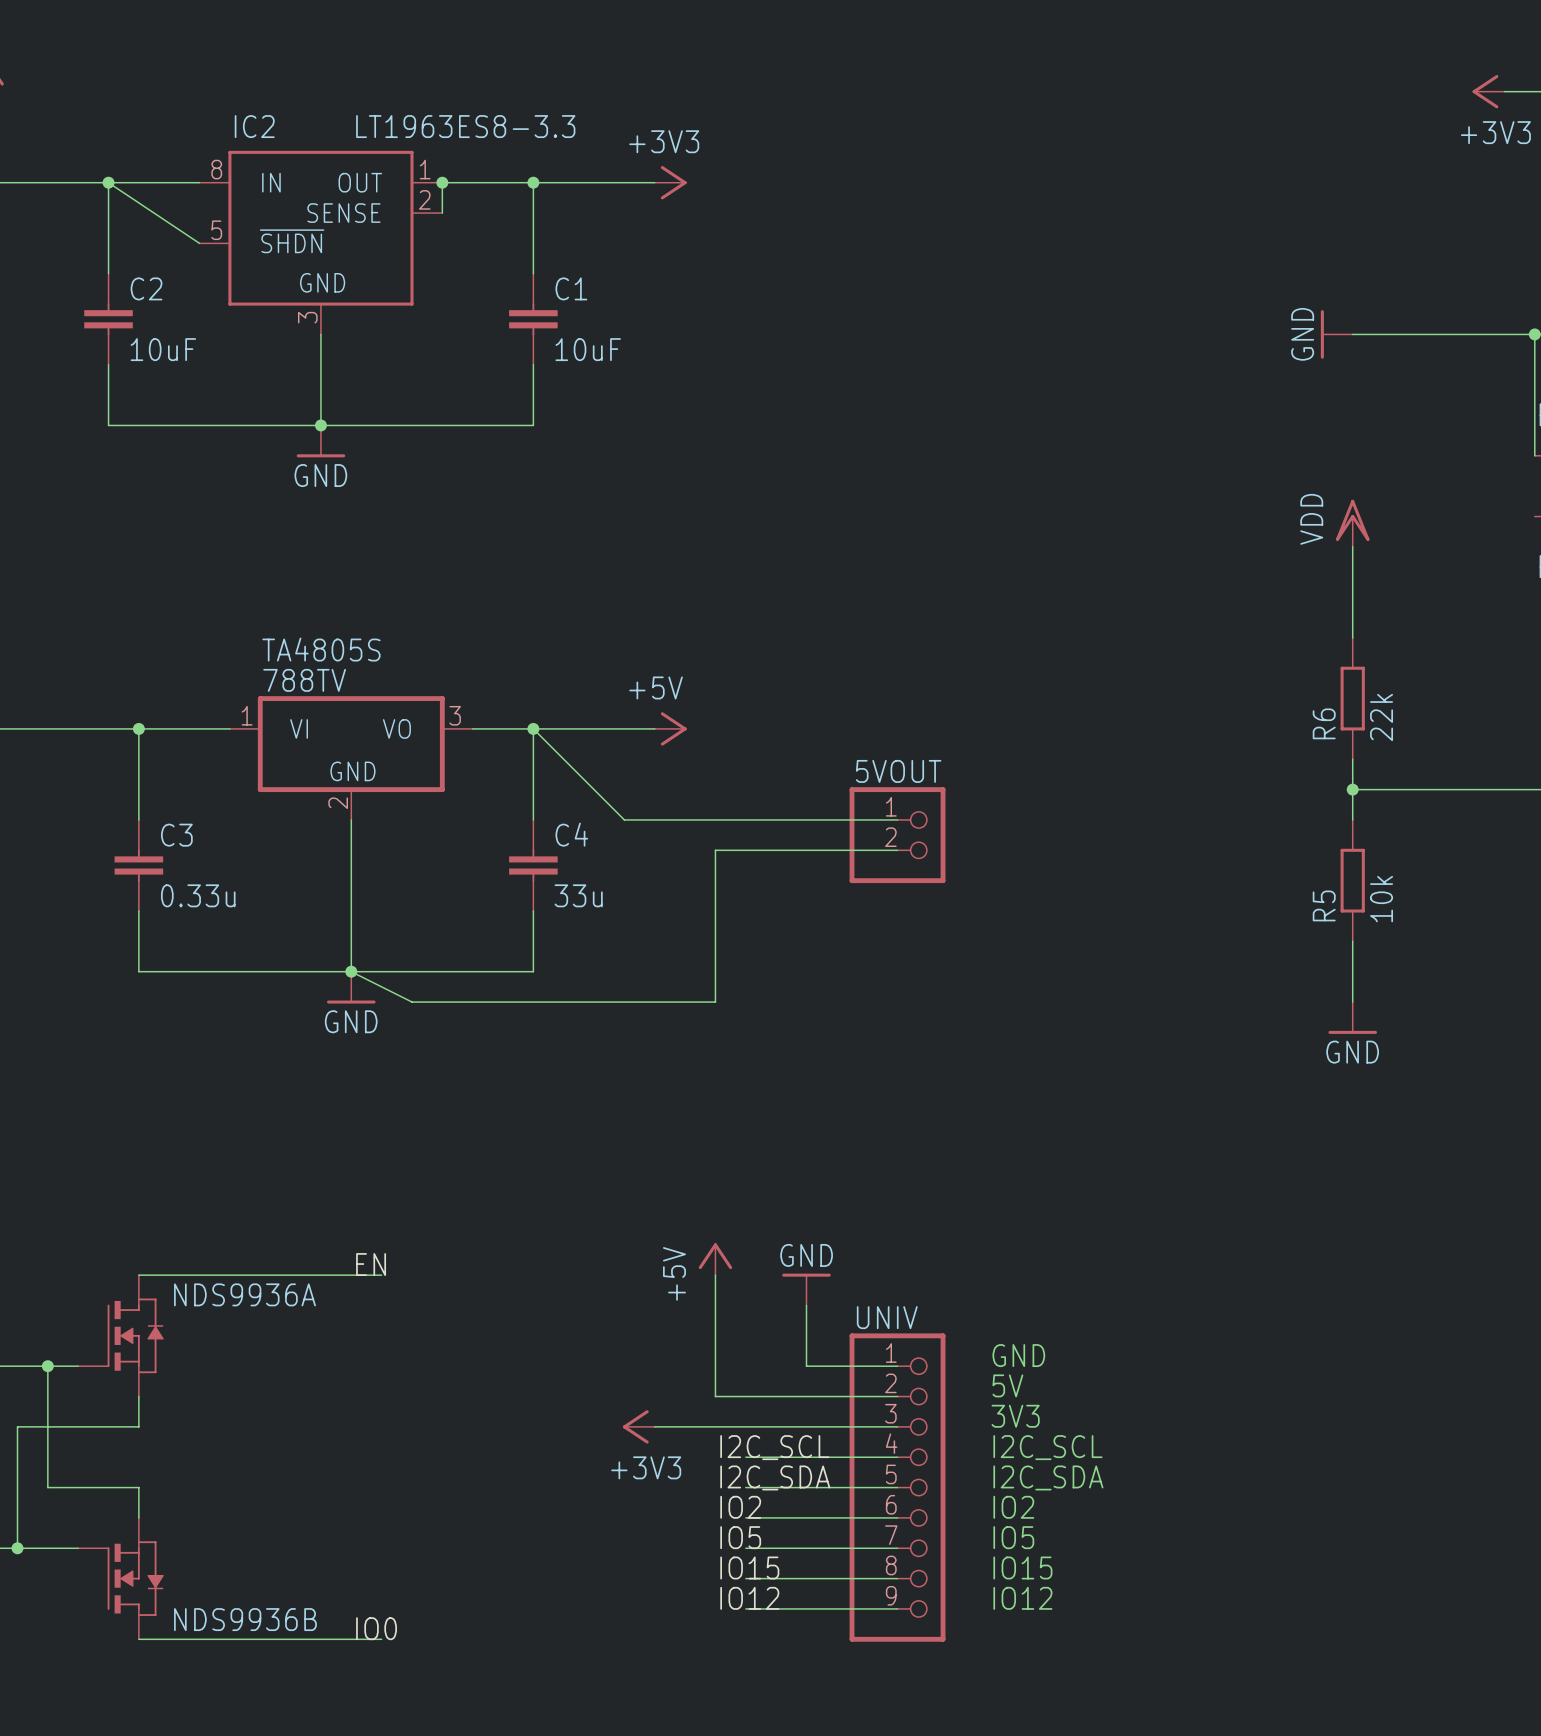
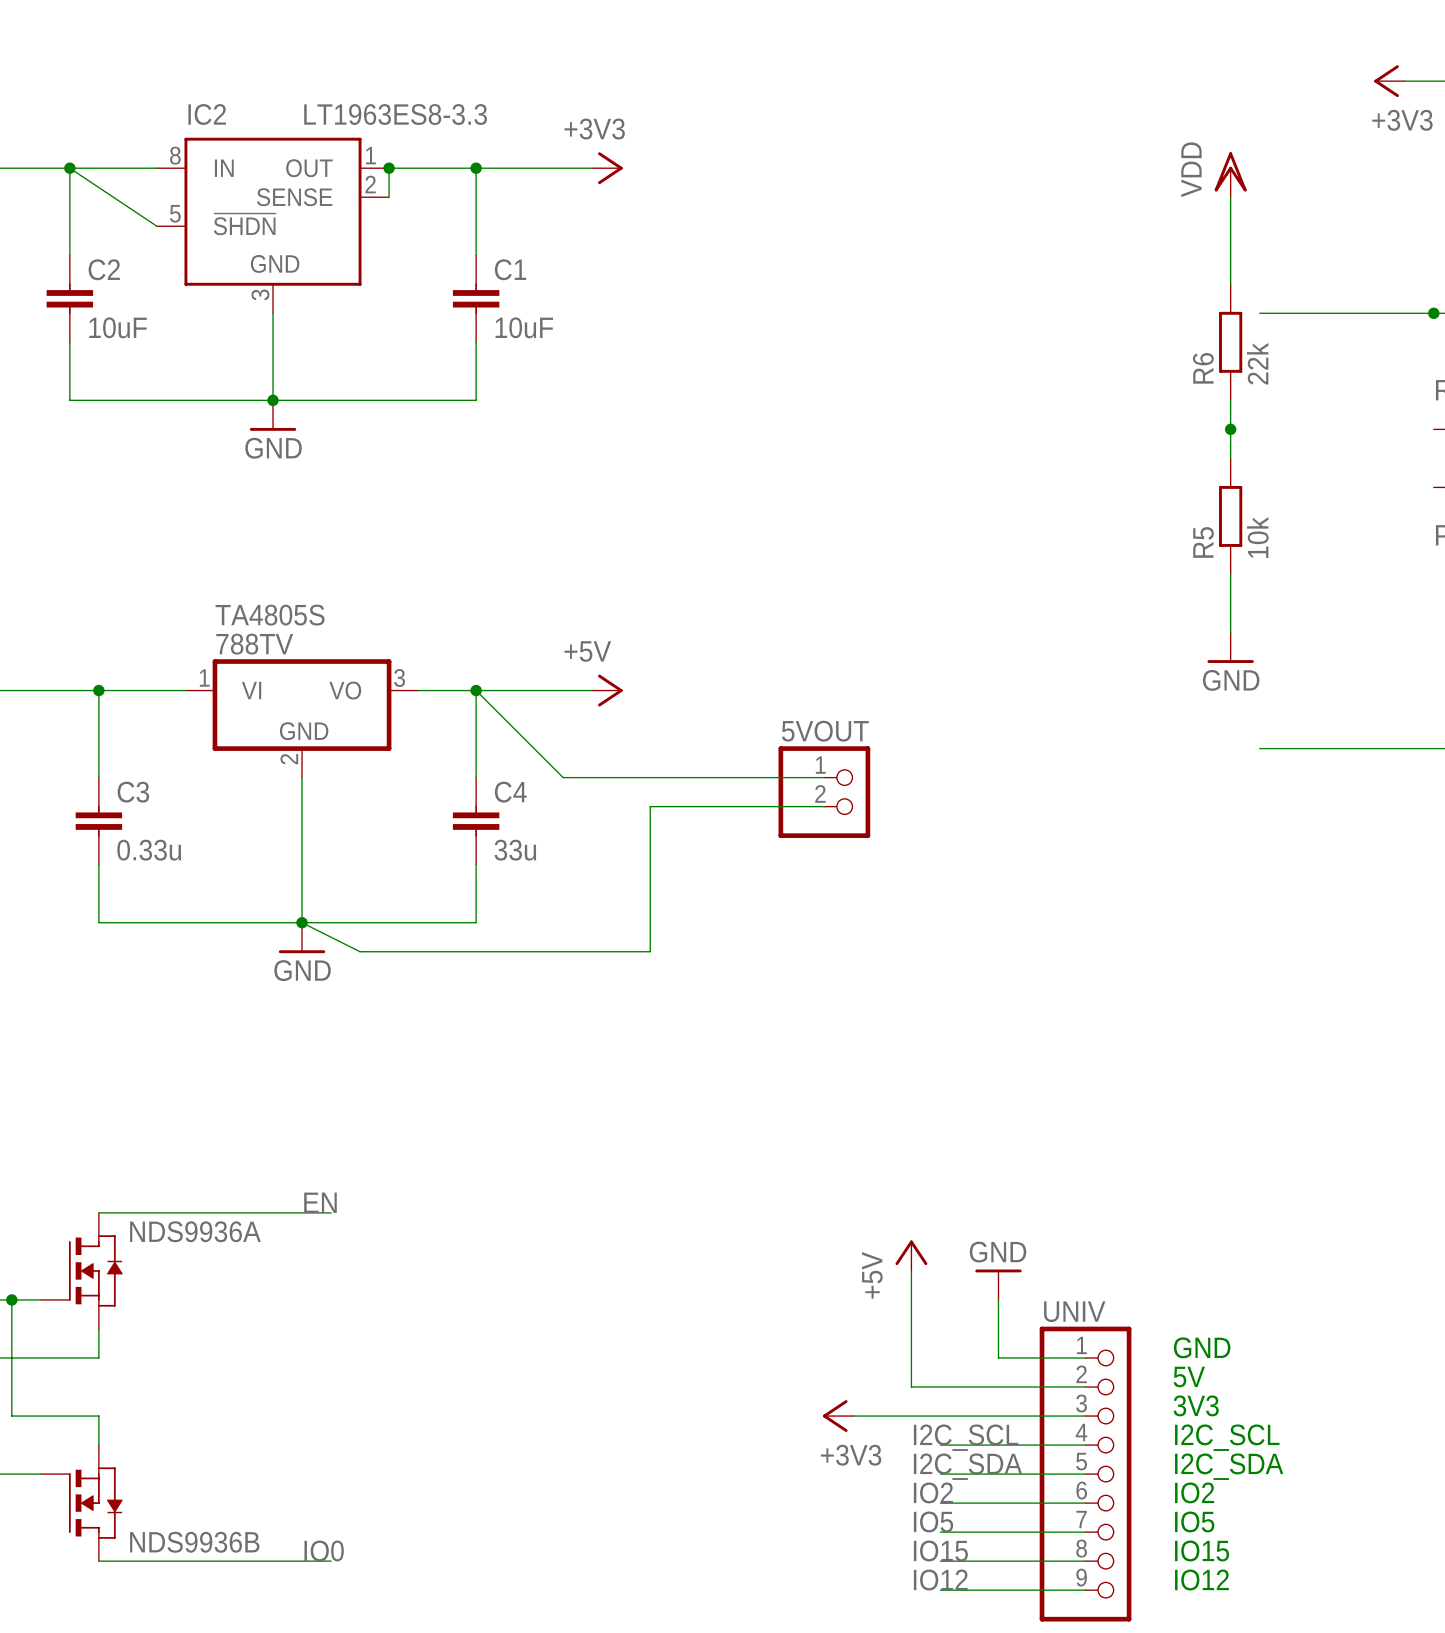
power symbol: none -> VDD (1230, 174)
wire: none -> (1230, 197) (1230, 284)
power symbol: GND (1336, 334) -> none
wire: (1534, 334) (1534, 455) -> none
wire: none -> (1230, 400) (1230, 458)
junction: none -> (1230, 429)
power symbol: VDD (1352, 523) -> none
wire: (1352, 546) (1352, 637) -> none
power symbol: none -> GND (1230, 647)
R6 position: (1352, 698) -> (1230, 342)
wire: (1352, 759) (1352, 819) -> (1230, 574) (1230, 632)
junction: (1352, 789) -> none
R5 position: (1352, 880) -> (1230, 516)
wire: (1352, 941) (1352, 1002) -> none
power symbol: GND (1352, 1017) -> none
power symbol position: +5V (715, 1259) -> +5V (911, 1255)
wire: (715, 1275) (715, 1396) (897, 1396) -> (911, 1270) (911, 1387) (1085, 1387)
power symbol: GND (806, 1289) -> none
wire: (806, 1305) (806, 1366) (897, 1366) -> (998, 1299) (998, 1358) (1085, 1358)
power symbol: none -> GND (998, 1284)
text position: GND (1018, 1355) -> GND (1202, 1347)
text position: 5V (1007, 1385) -> 5V (1189, 1377)
text position: 3V3 (1015, 1416) -> 3V3 (1196, 1405)
power symbol position: +3V3 (638, 1426) -> +3V3 (838, 1416)
wire: (654, 1426) (897, 1426) -> (853, 1416) (1085, 1416)
label position: I2C_SCL (774, 1447) -> I2C_SCL (966, 1437)
text position: I2C_SCL (1047, 1447) -> I2C_SCL (1227, 1437)
wire: (745, 1457) (897, 1457) -> (940, 1445) (1085, 1445)
label position: I2C_SDA (775, 1477) -> I2C_SDA (968, 1466)
text position: I2C_SDA (1048, 1477) -> I2C_SDA (1229, 1466)
wire: (745, 1487) (897, 1487) -> (940, 1474) (1085, 1474)
UNIV position: (897, 1487) -> (1085, 1474)
label position: IO2 (740, 1507) -> IO2 (933, 1492)
text position: IO2 (1013, 1507) -> IO2 (1194, 1492)
wire: (745, 1517) (897, 1517) -> (940, 1503) (1085, 1503)
label position: IO5 (740, 1537) -> IO5 (933, 1521)
text position: IO5 (1013, 1537) -> IO5 (1194, 1521)
wire: (745, 1548) (897, 1548) -> (940, 1532) (1085, 1532)
label position: IO15 (749, 1567) -> IO15 (940, 1550)
text position: IO15 (1022, 1567) -> IO15 (1202, 1550)
wire: (745, 1578) (897, 1578) -> (940, 1561) (1085, 1561)
label position: IO12 (749, 1598) -> IO12 (940, 1579)
text position: IO12 (1022, 1598) -> IO12 (1201, 1579)
wire: (745, 1608) (897, 1608) -> (940, 1590) (1085, 1590)

